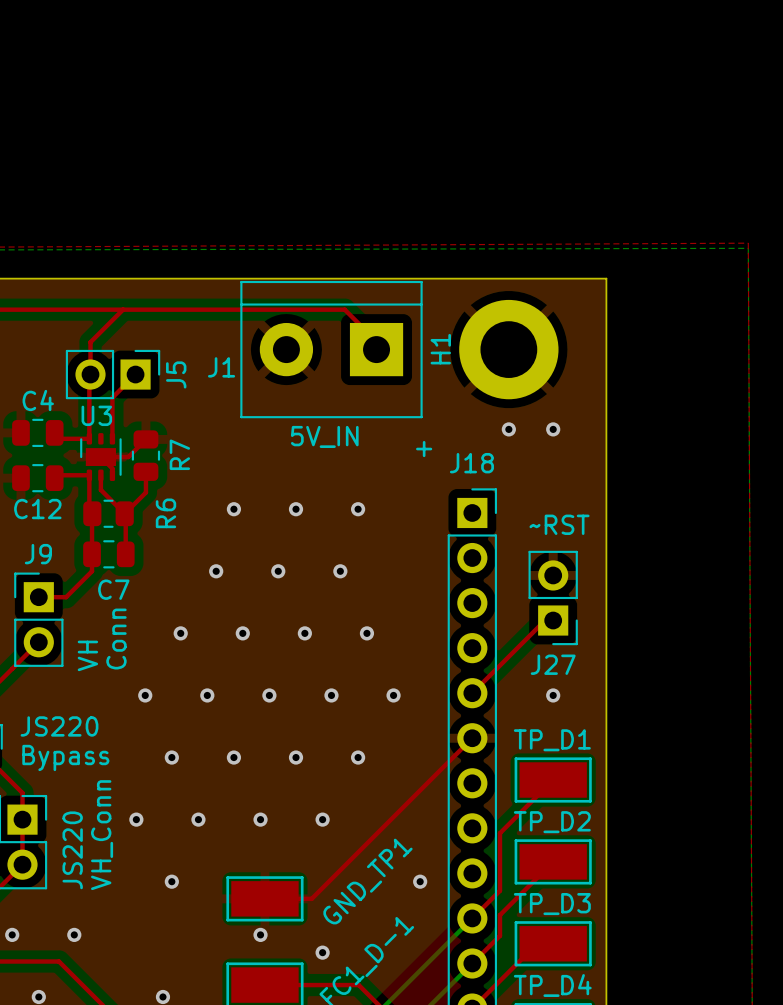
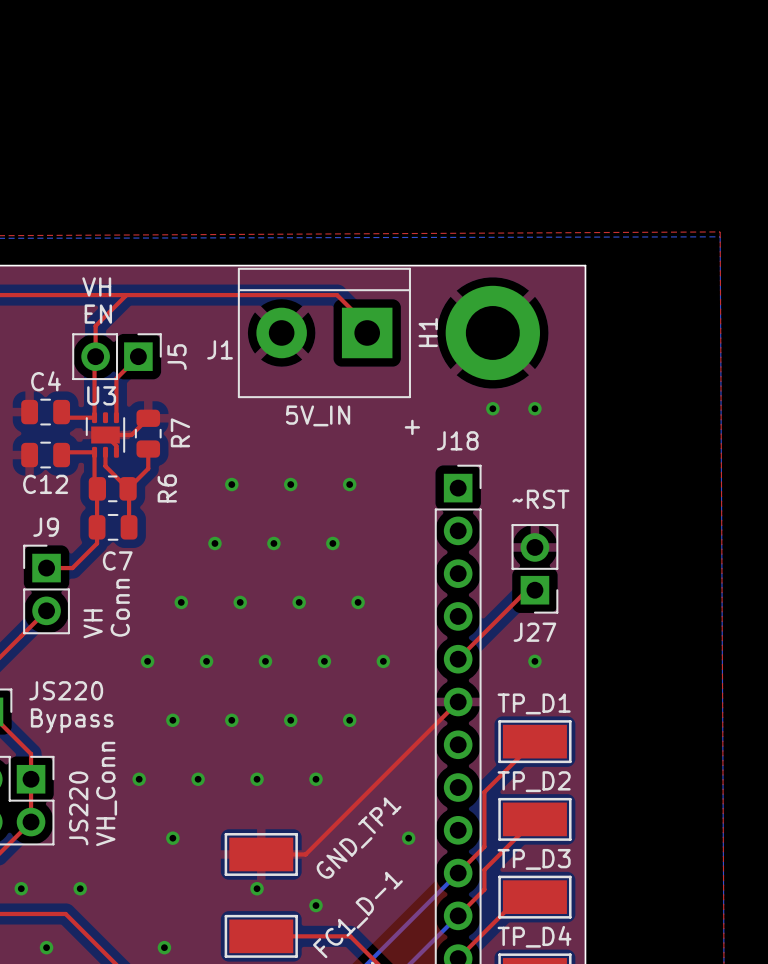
text: none -> VH (96, 286)
text: none -> EN (98, 314)

